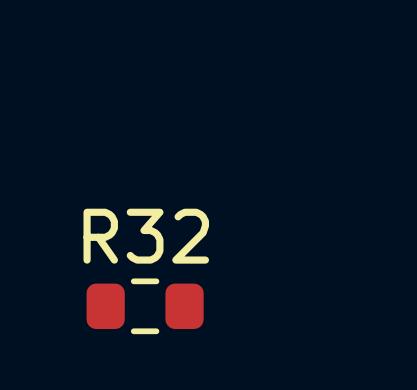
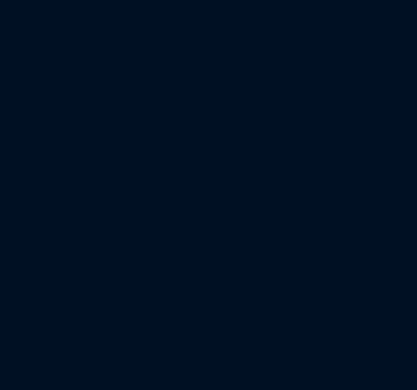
R32: (145, 306) -> none

